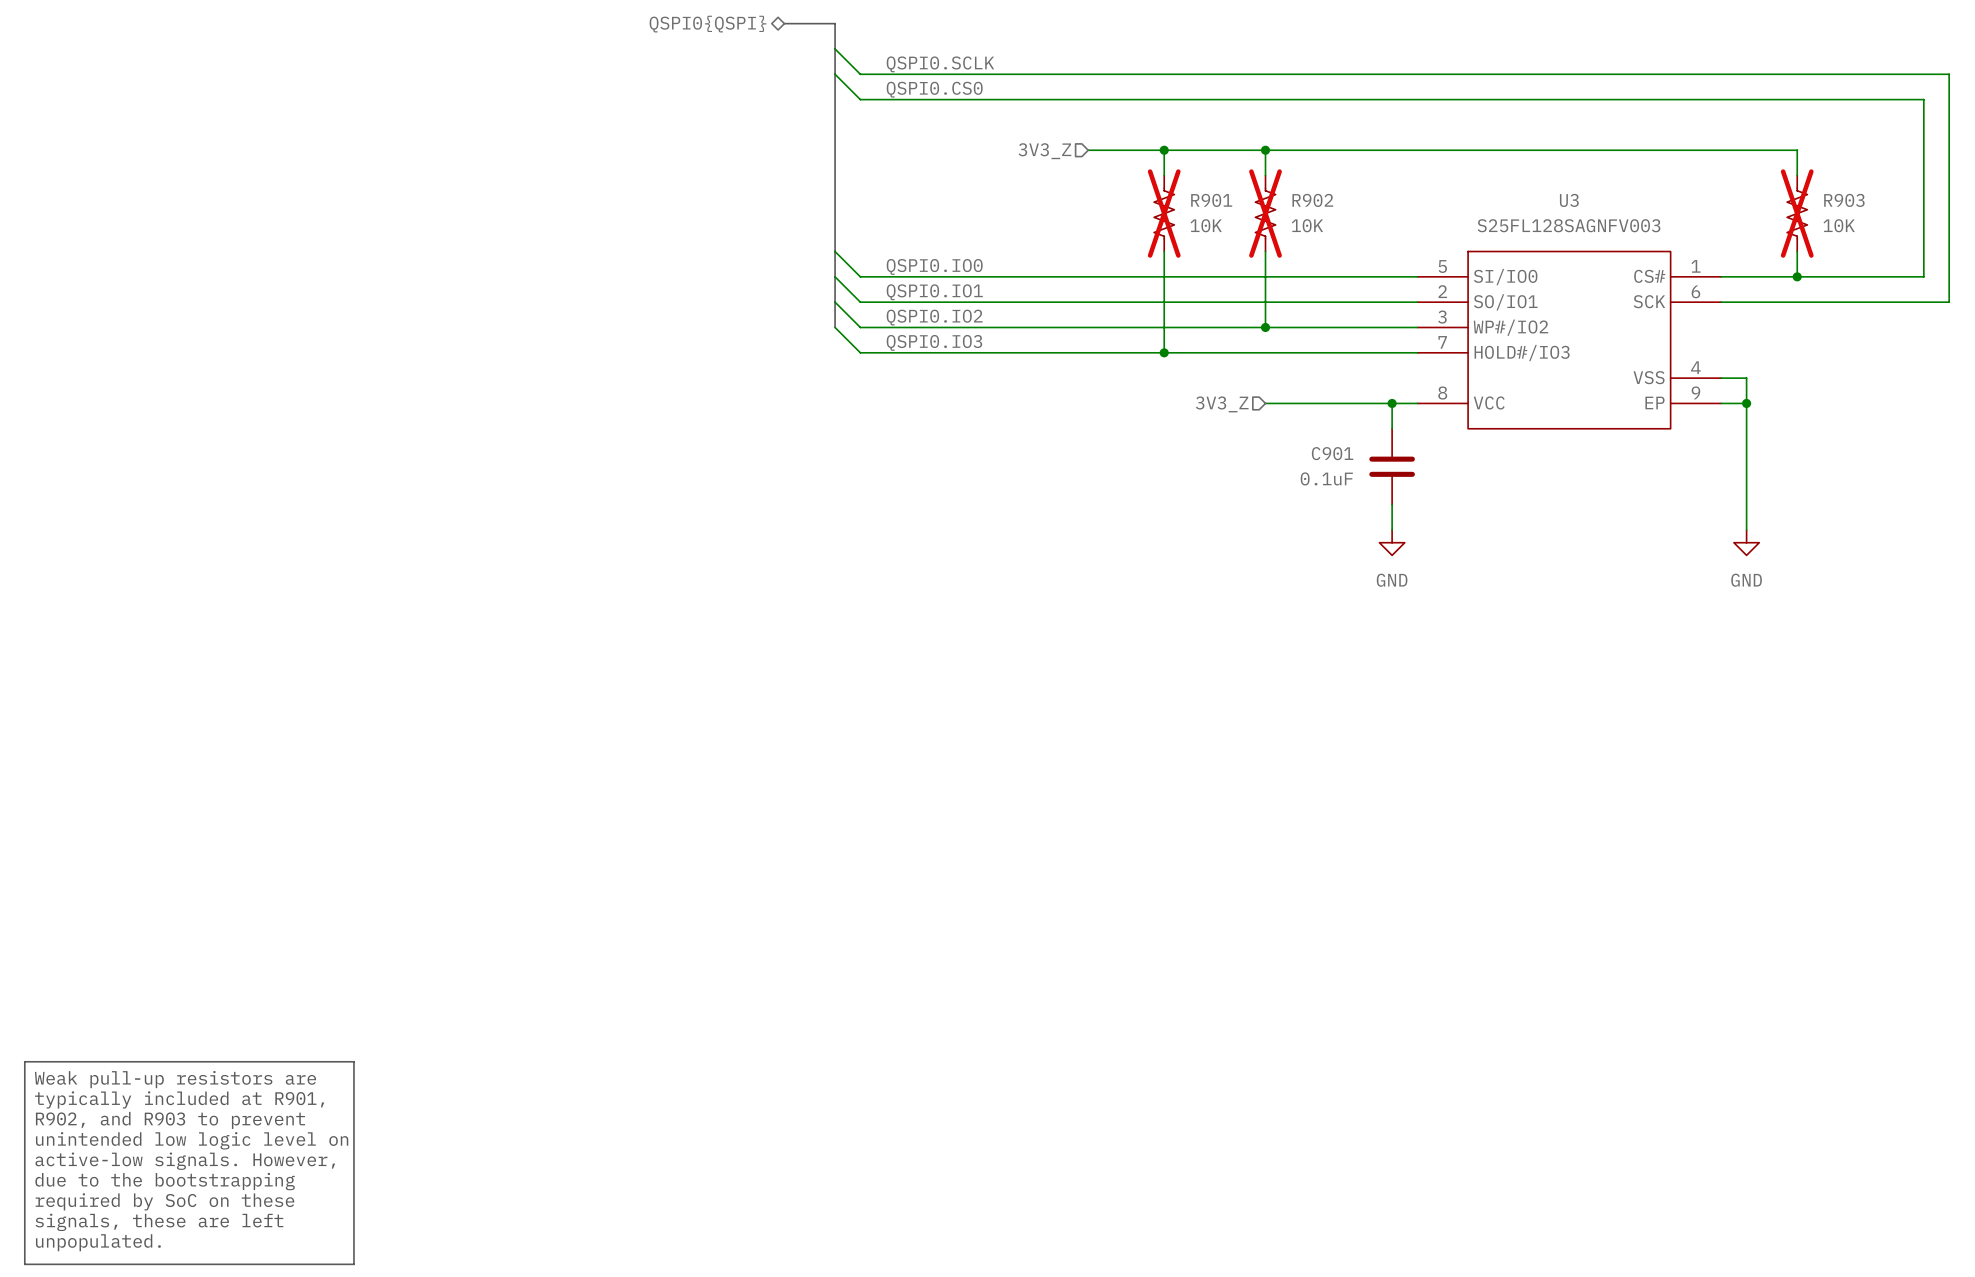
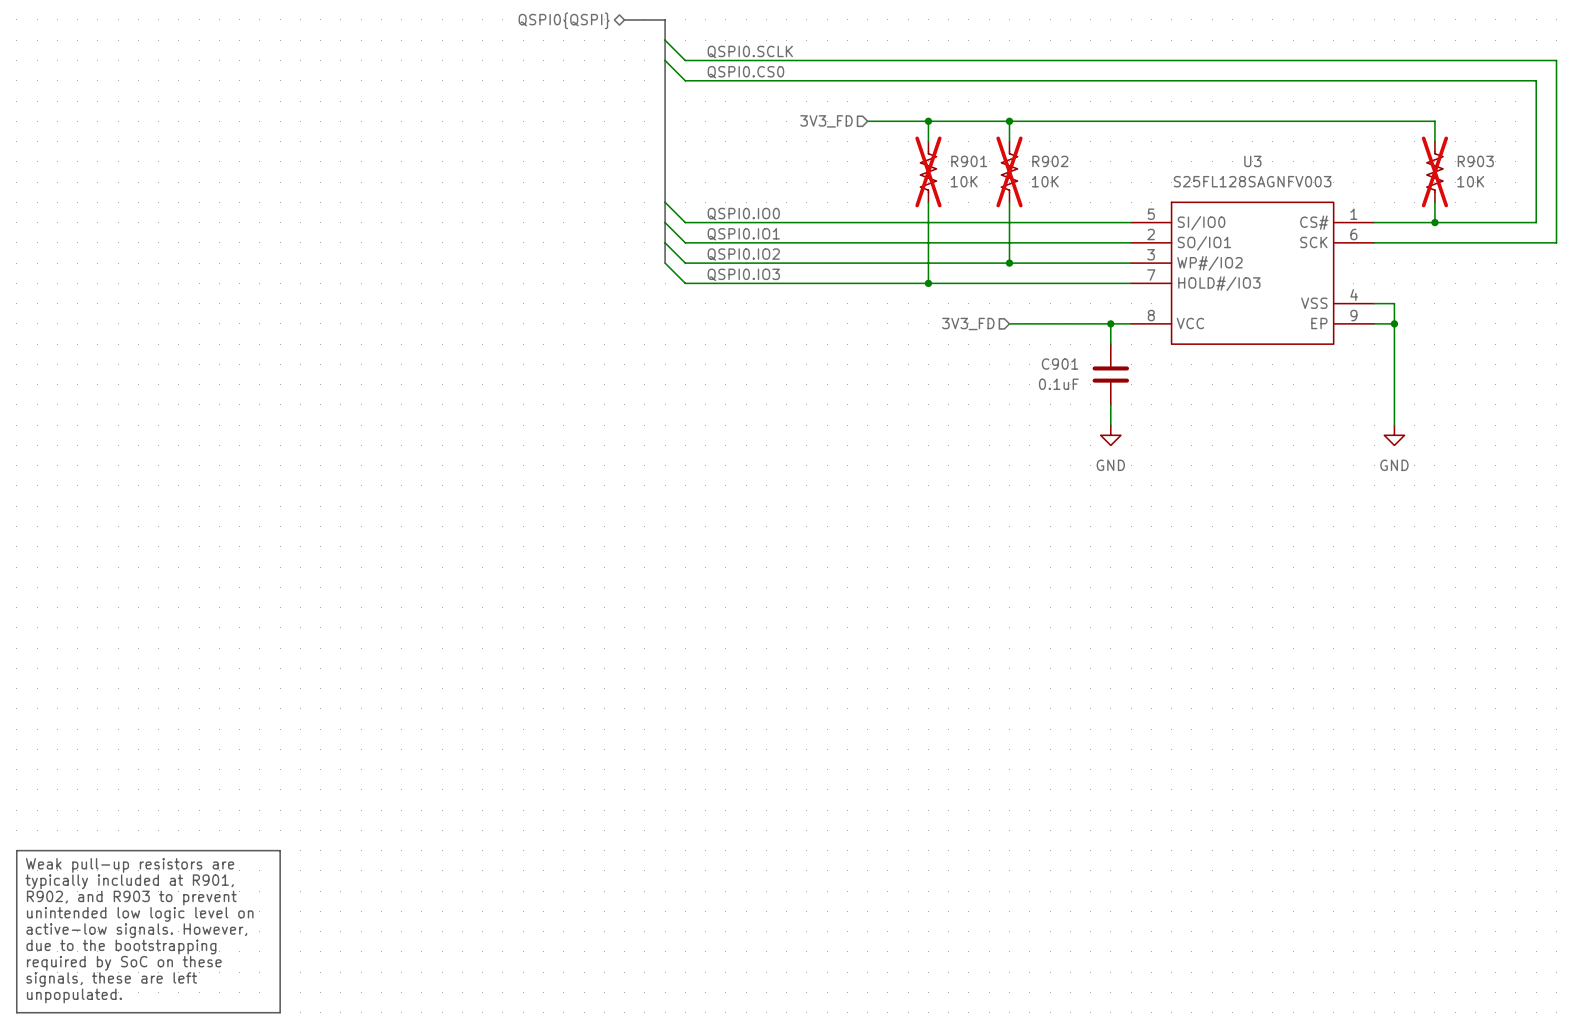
hierarchical label: 3V3_Z (1044, 151) -> 3V3_FD (826, 121)
hierarchical label: 3V3_Z (1222, 404) -> 3V3_FD (968, 323)

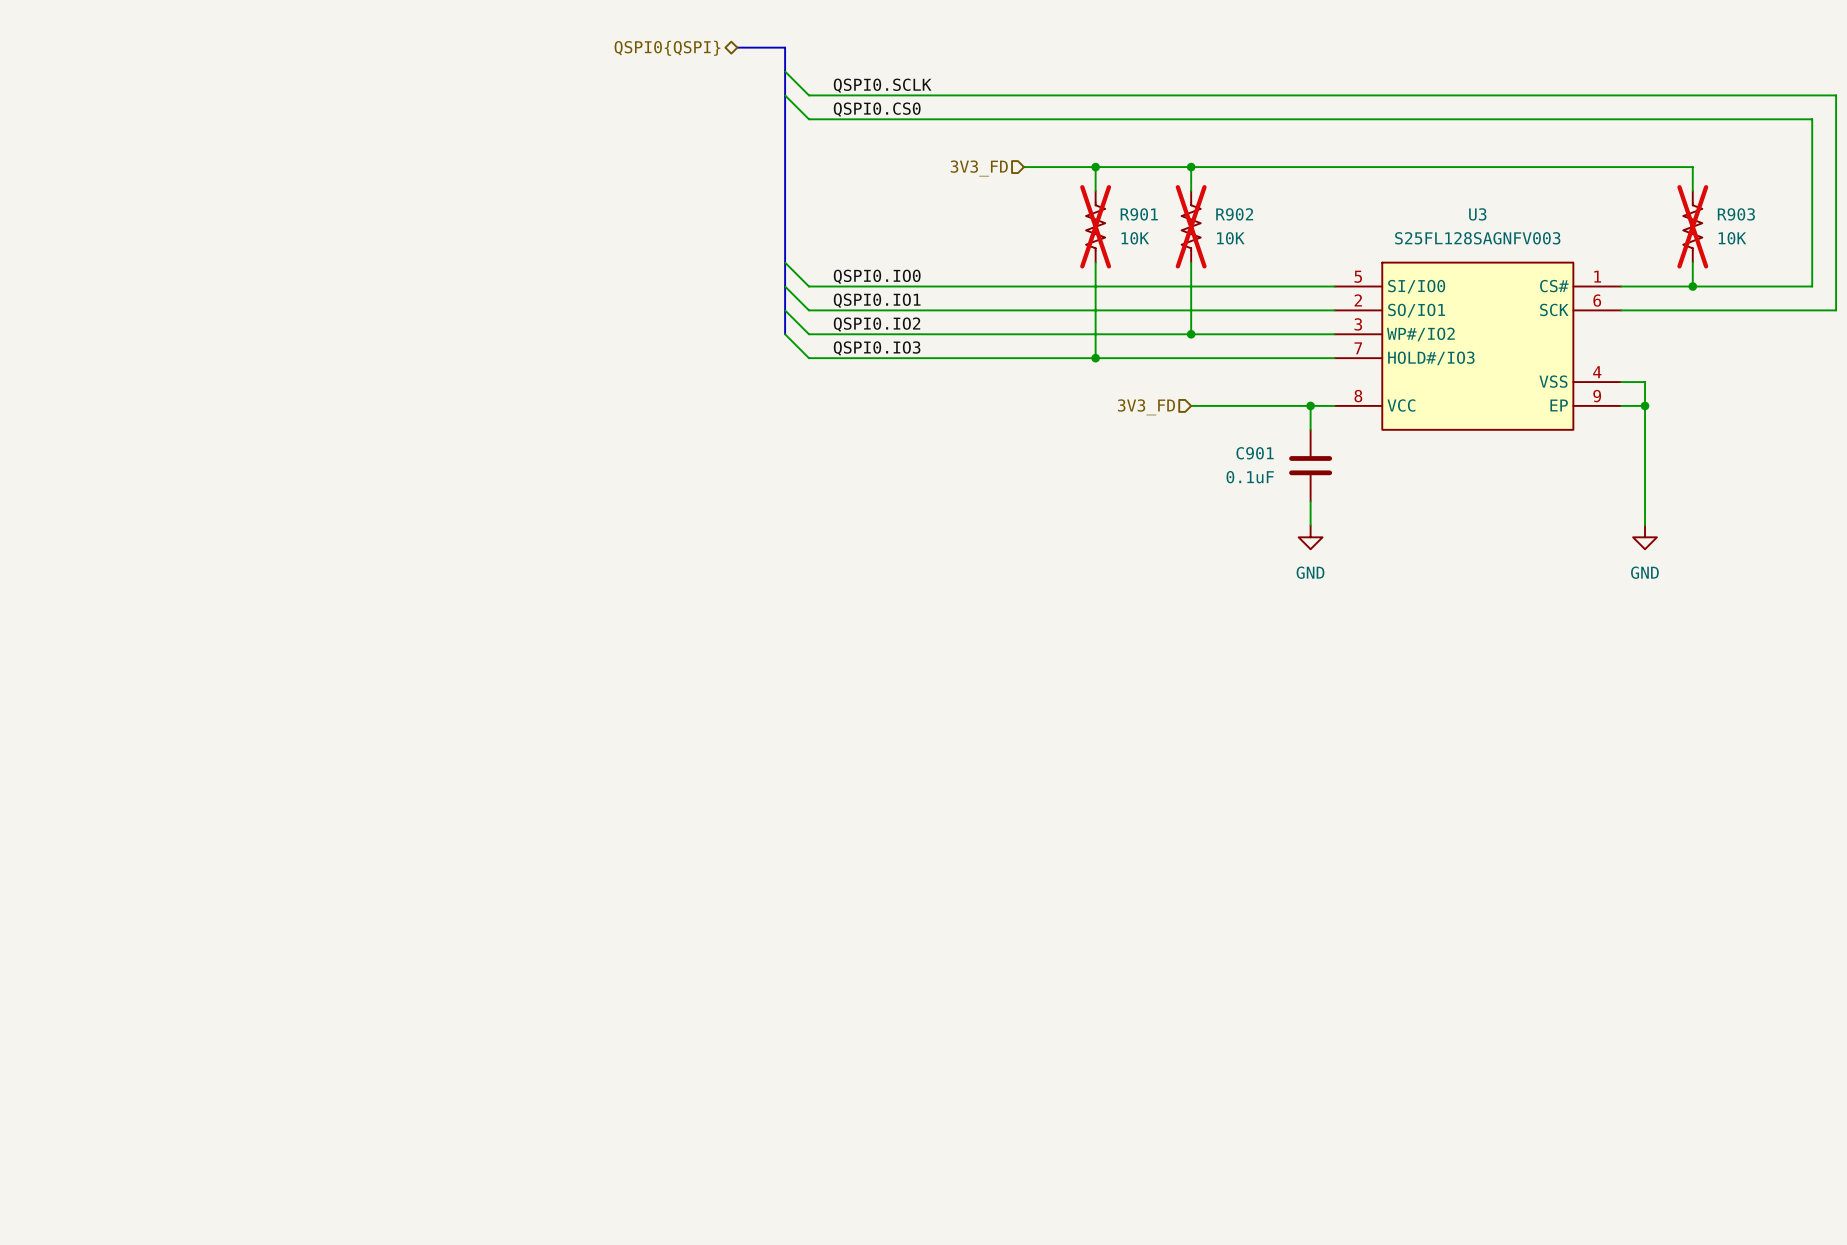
line: (16, 850) (280, 850) (280, 1012) (16, 1012) (16, 850) -> none
text: Weak pull-up resistors are (130, 865) -> none
text: typically included at R901, (129, 881) -> none
text: R902, and R903 to prevent (131, 898) -> none
text: unintended low logic level on (140, 914) -> none
text: active-low signals. However, (136, 930) -> none
text: due to the bootstrapping (121, 947) -> none
text: required by SoC on these (124, 963) -> none
text: signals, these are left (111, 979) -> none
text: unpopulated. (74, 995) -> none

